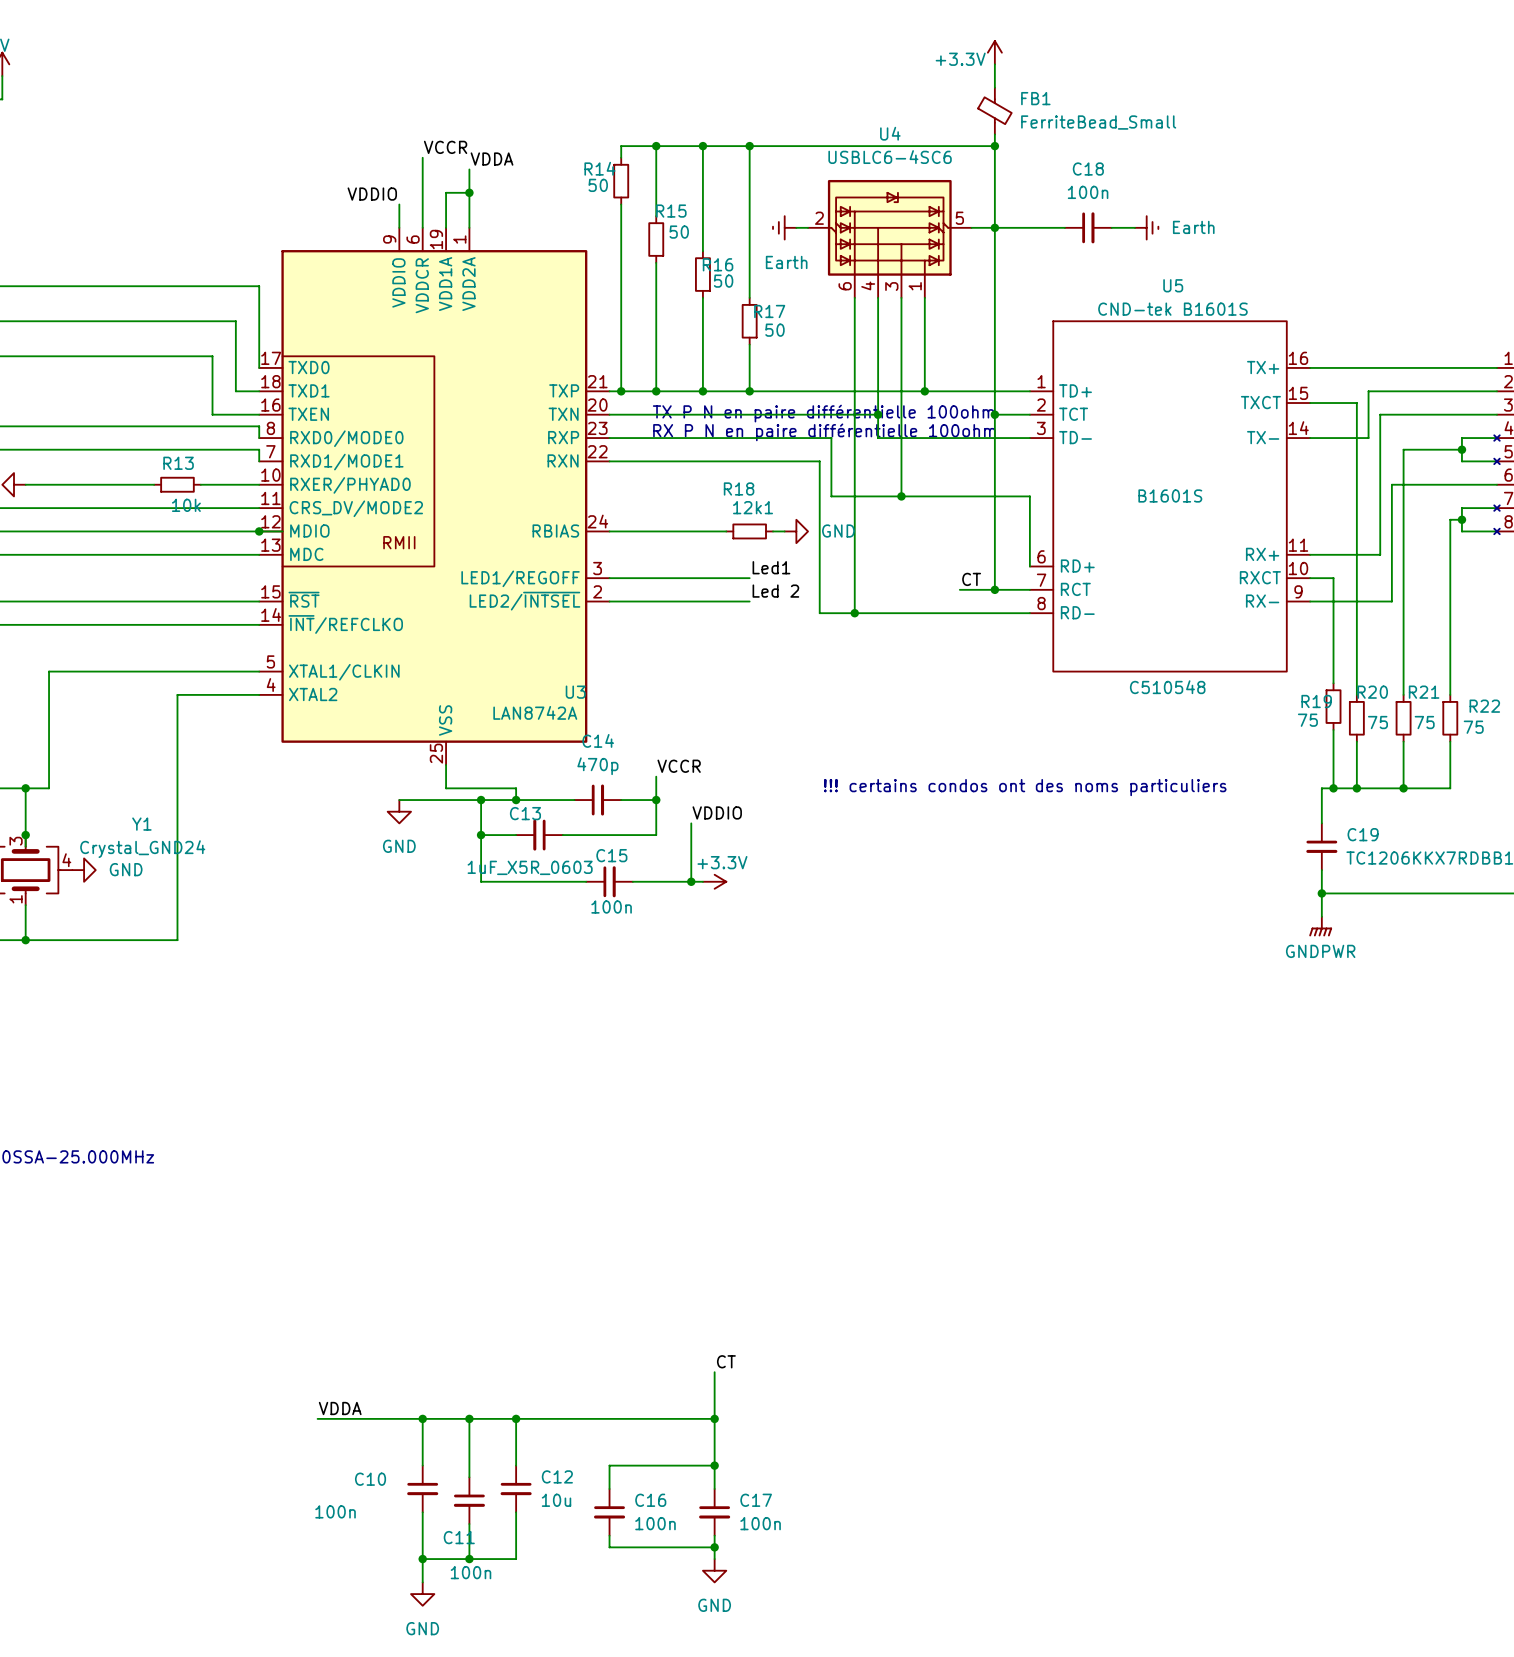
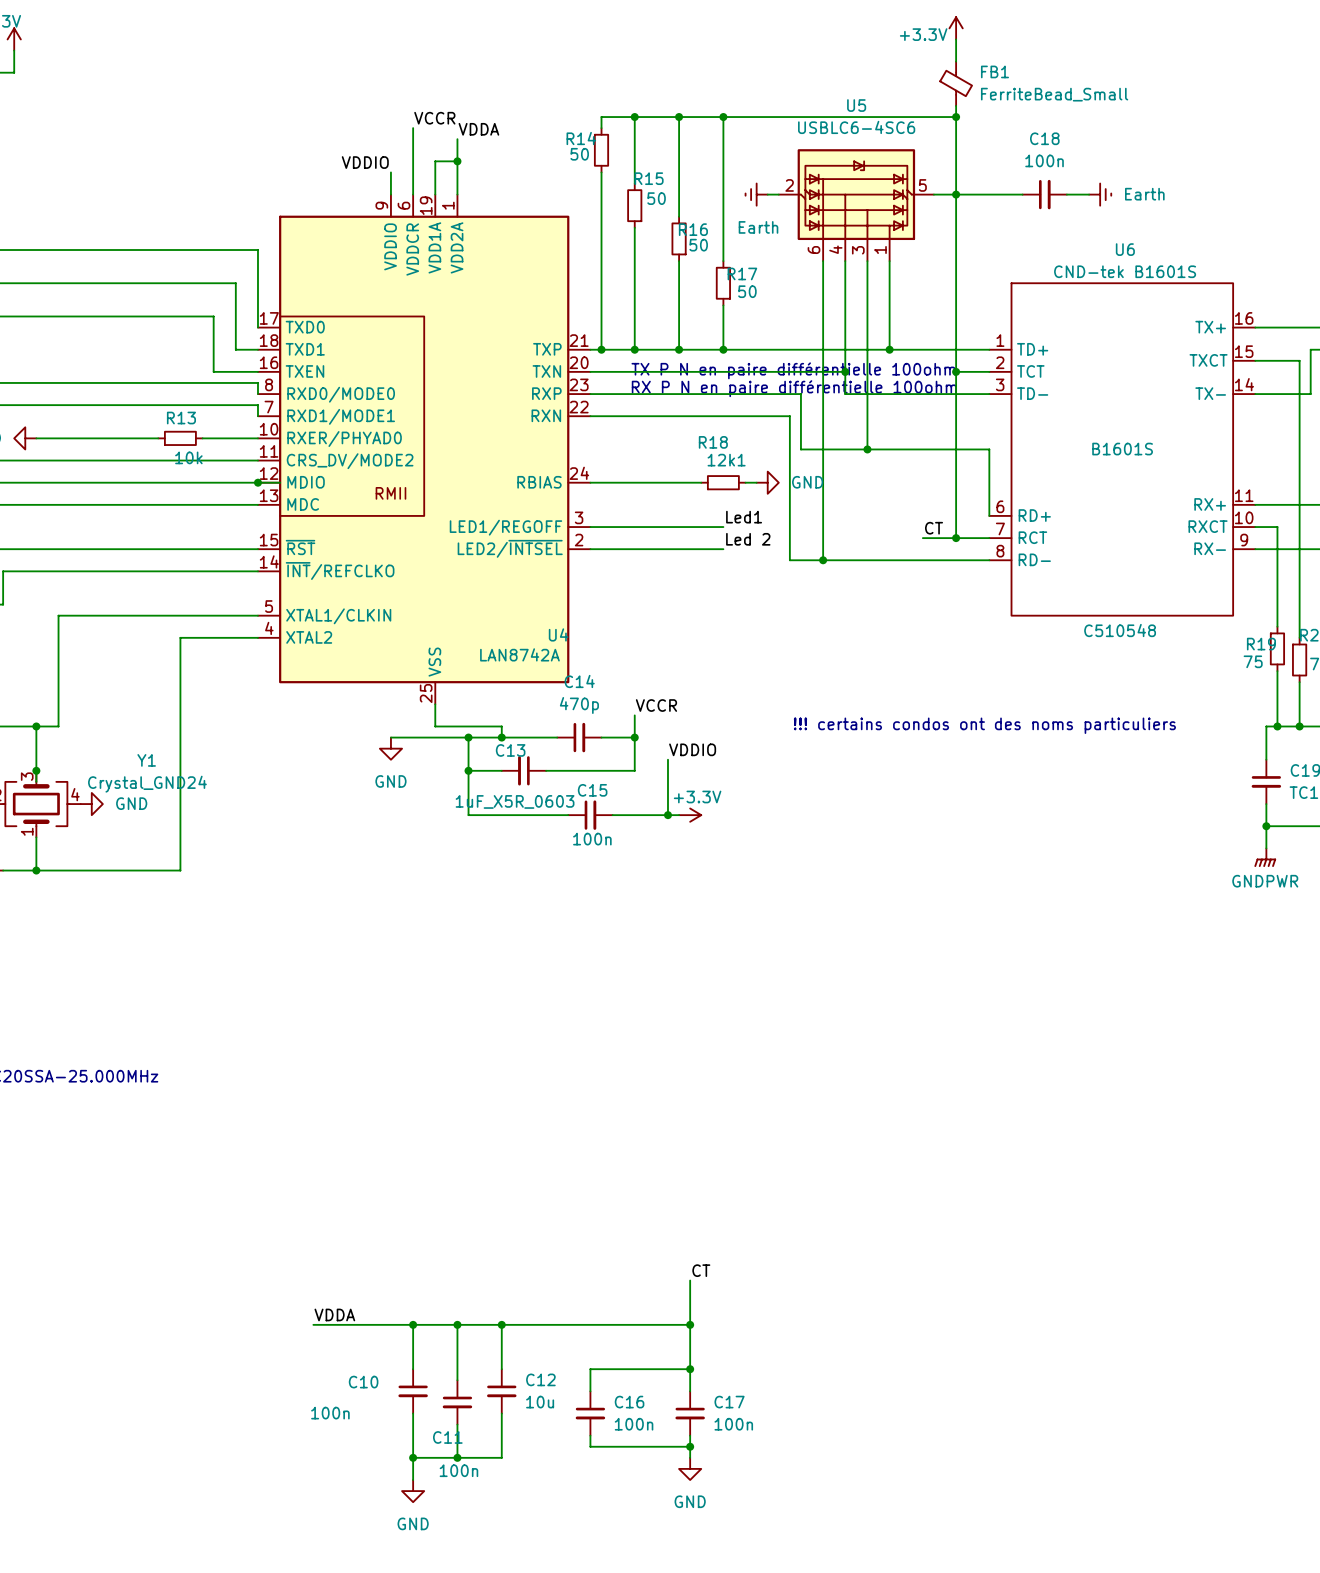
U4 name: U4 (890, 133) -> U5 (856, 105)
U5 name: U5 (1173, 285) -> U6 (1125, 249)
U3 name: U3 (575, 692) -> U4 (558, 634)

